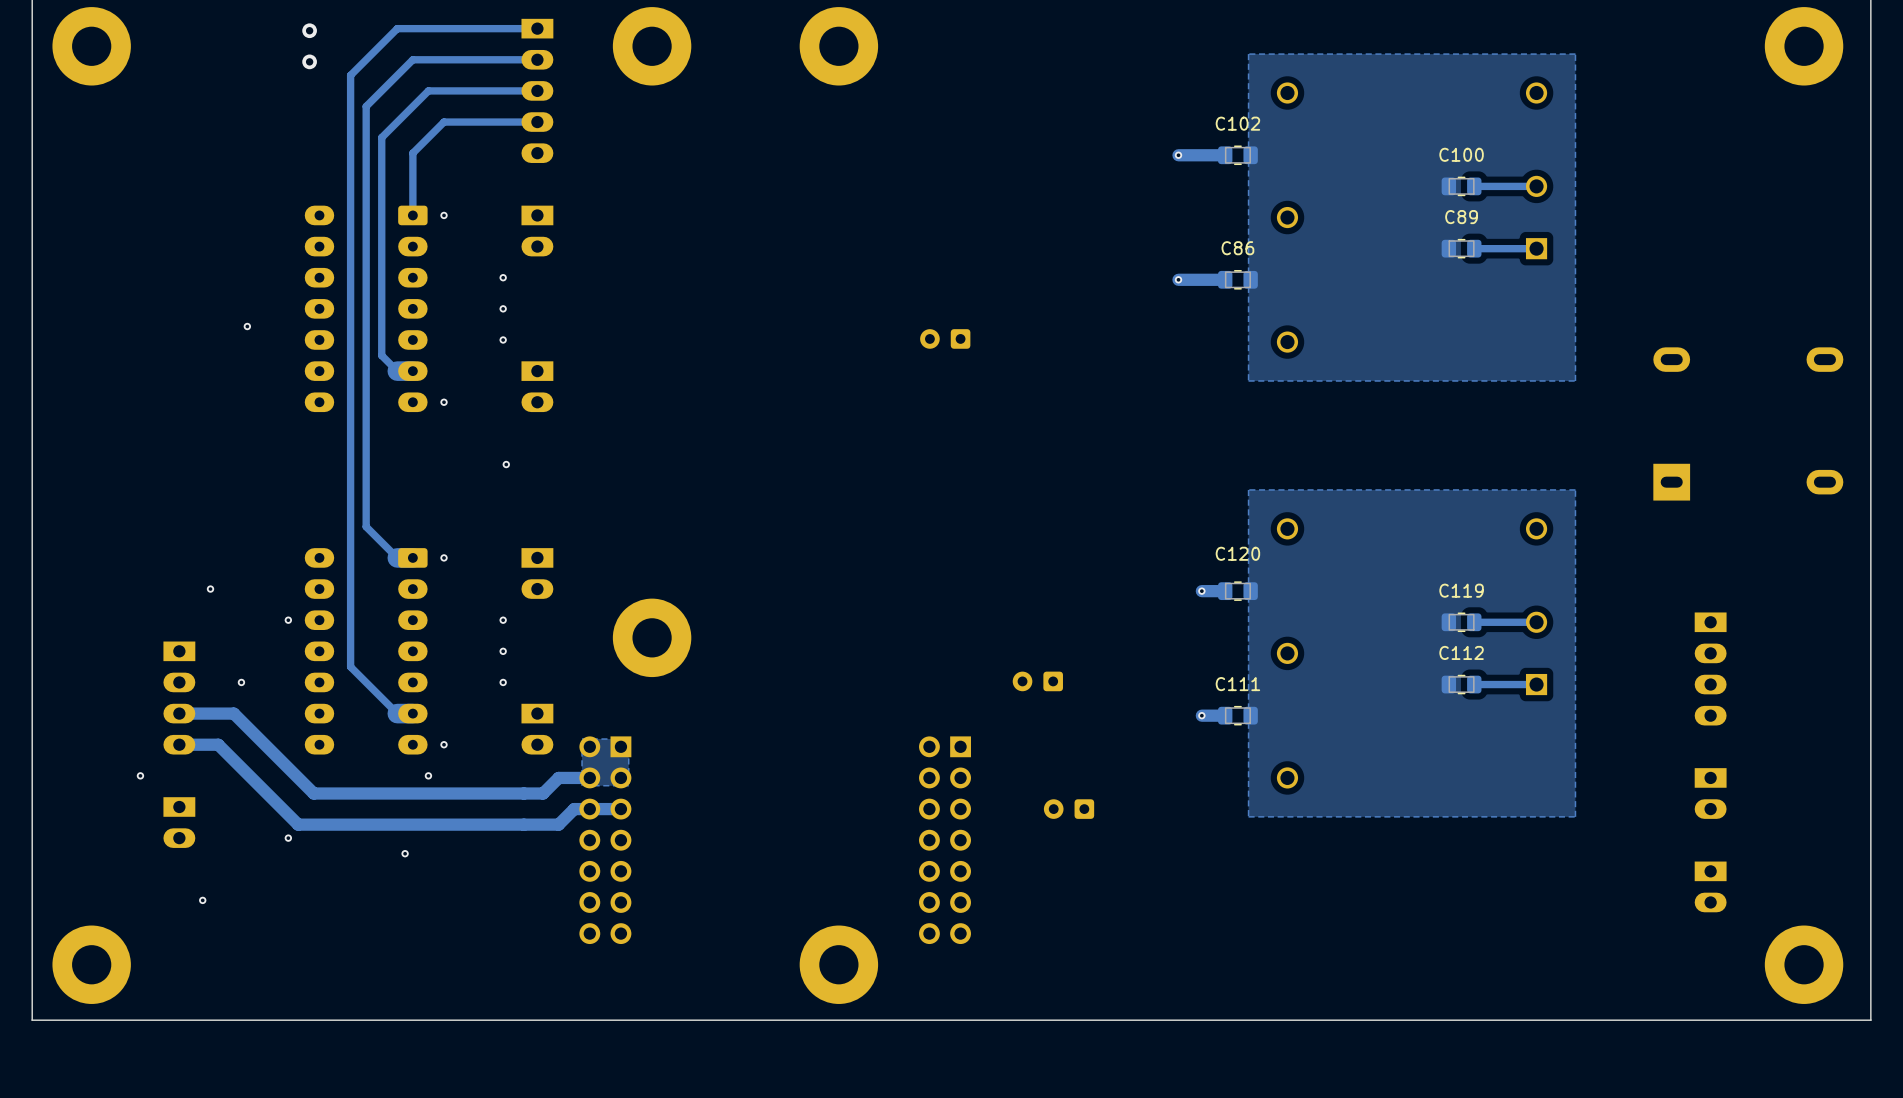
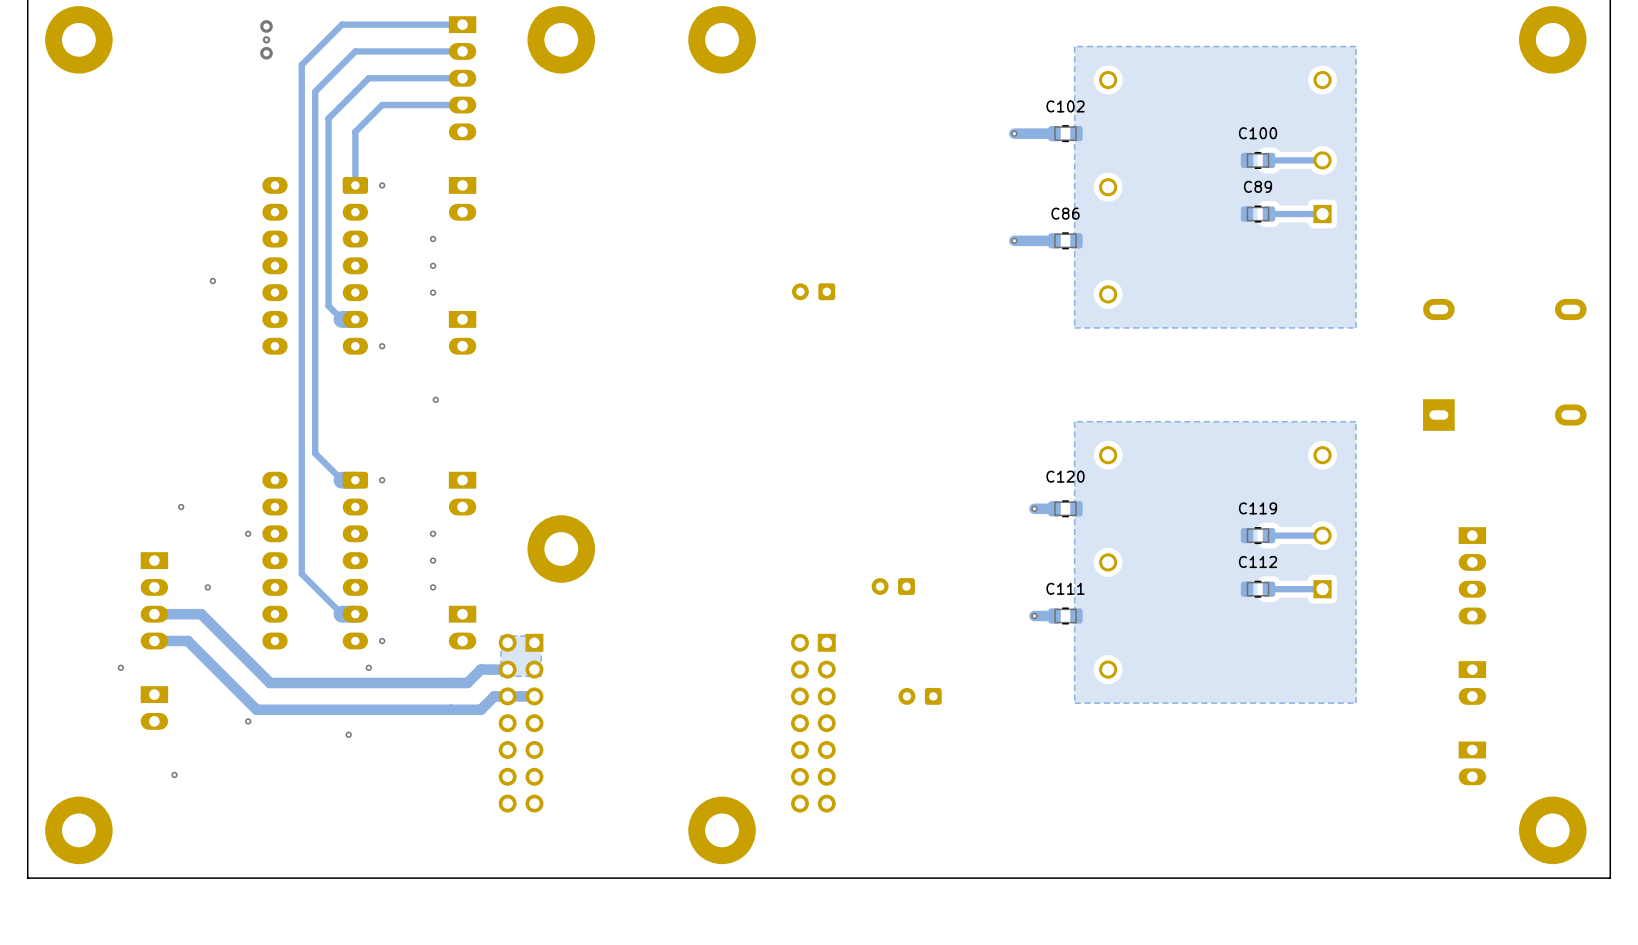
via: none -> (266, 39)

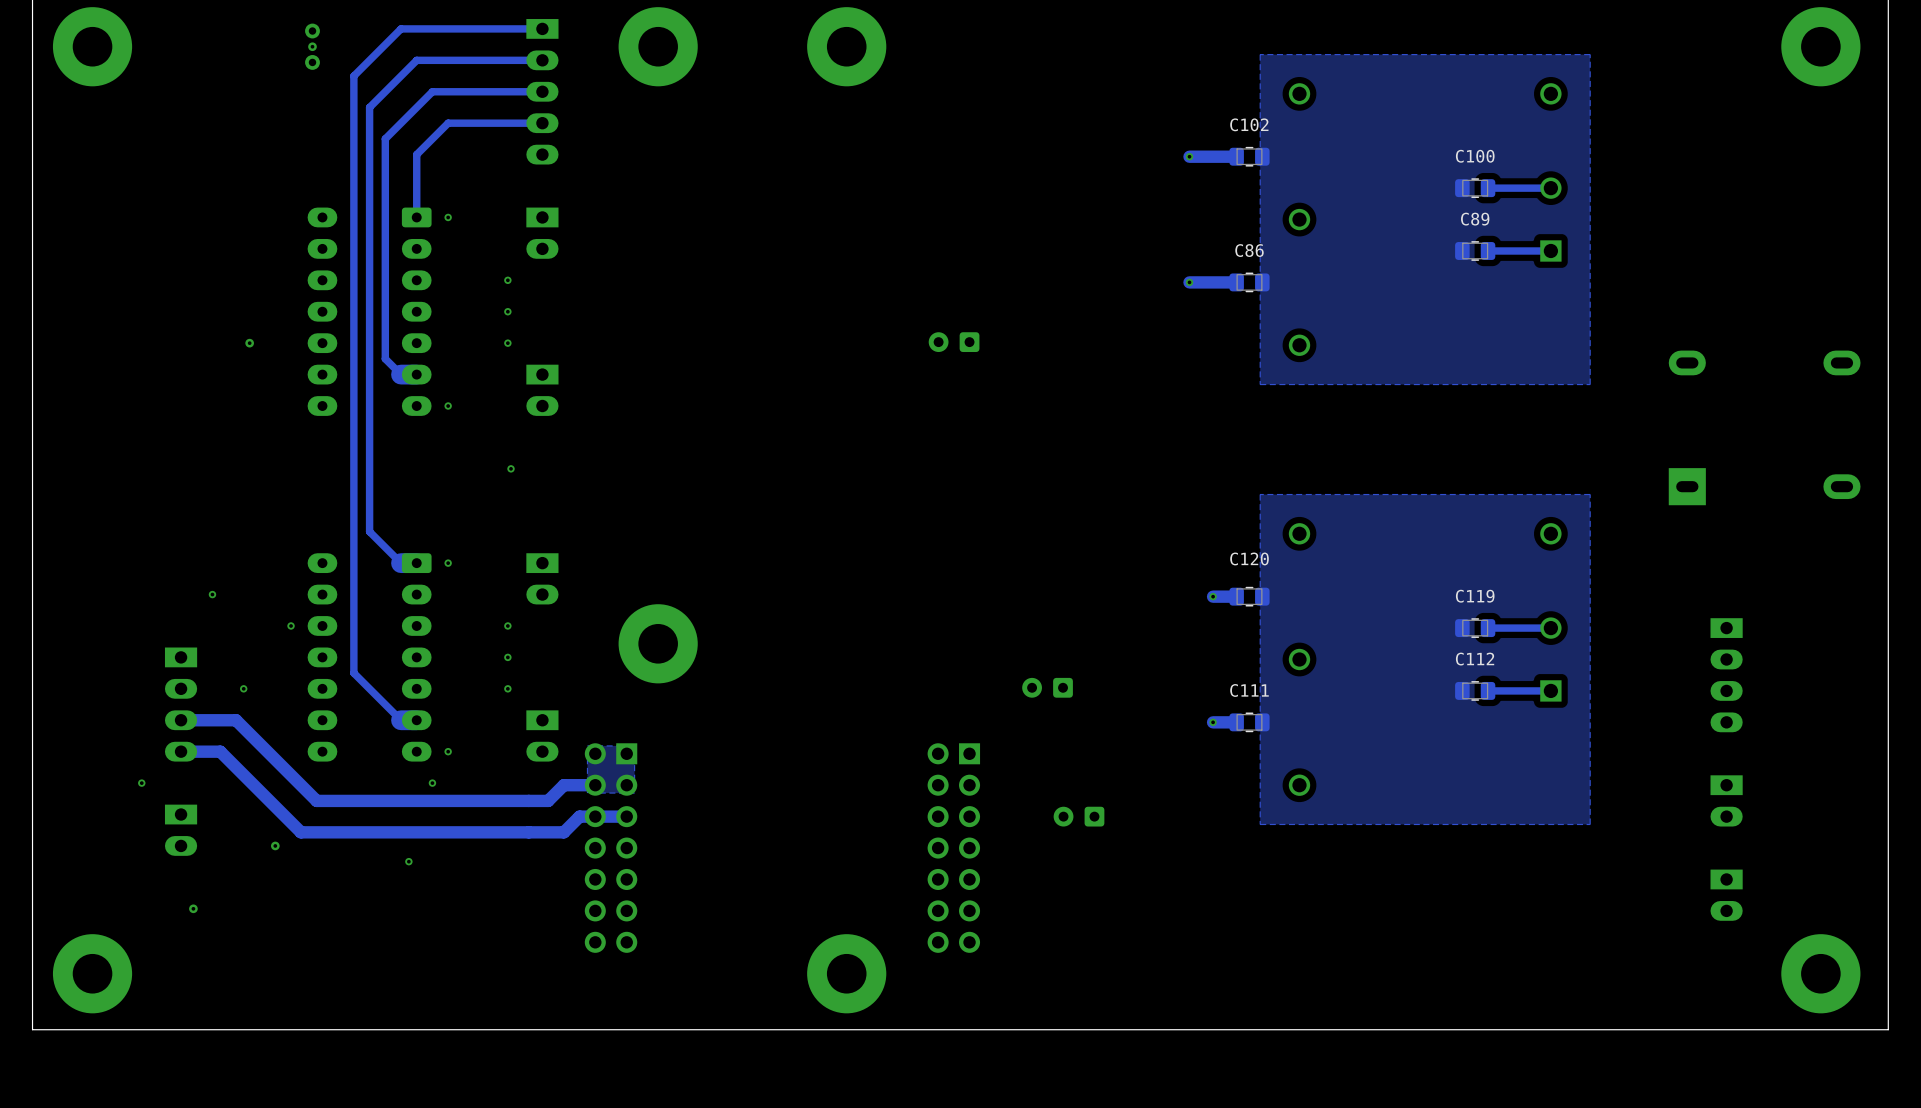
via: (212, 281) -> none
via: none -> (249, 343)
via: none -> (275, 845)
via: (248, 721) -> none
via: none -> (193, 908)
via: (174, 774) -> none

